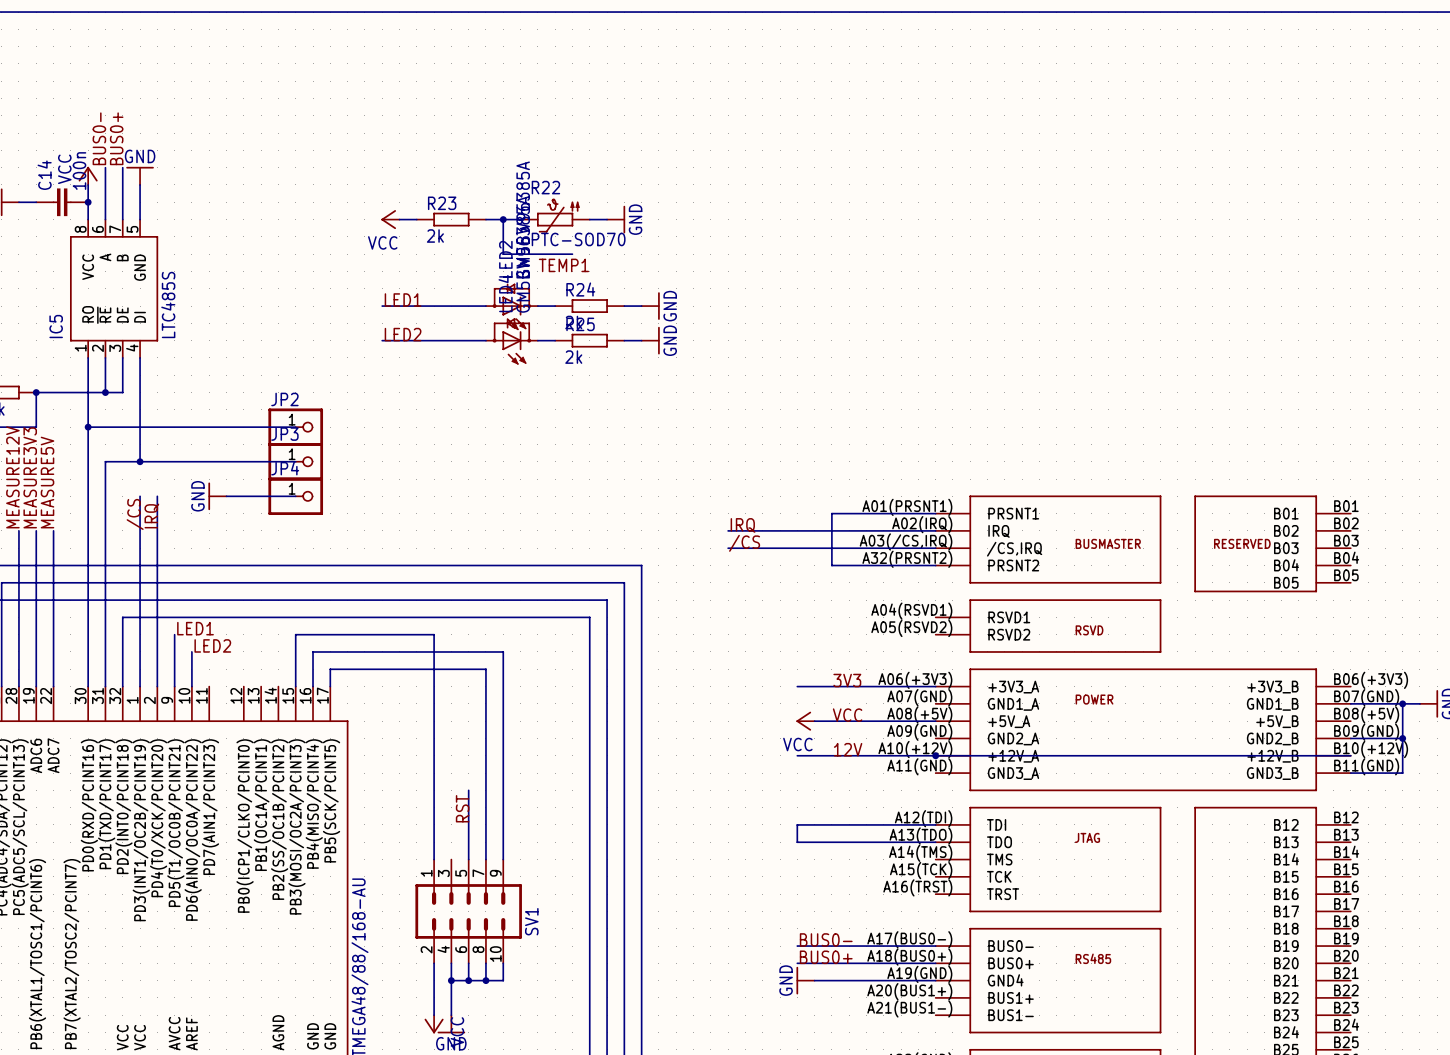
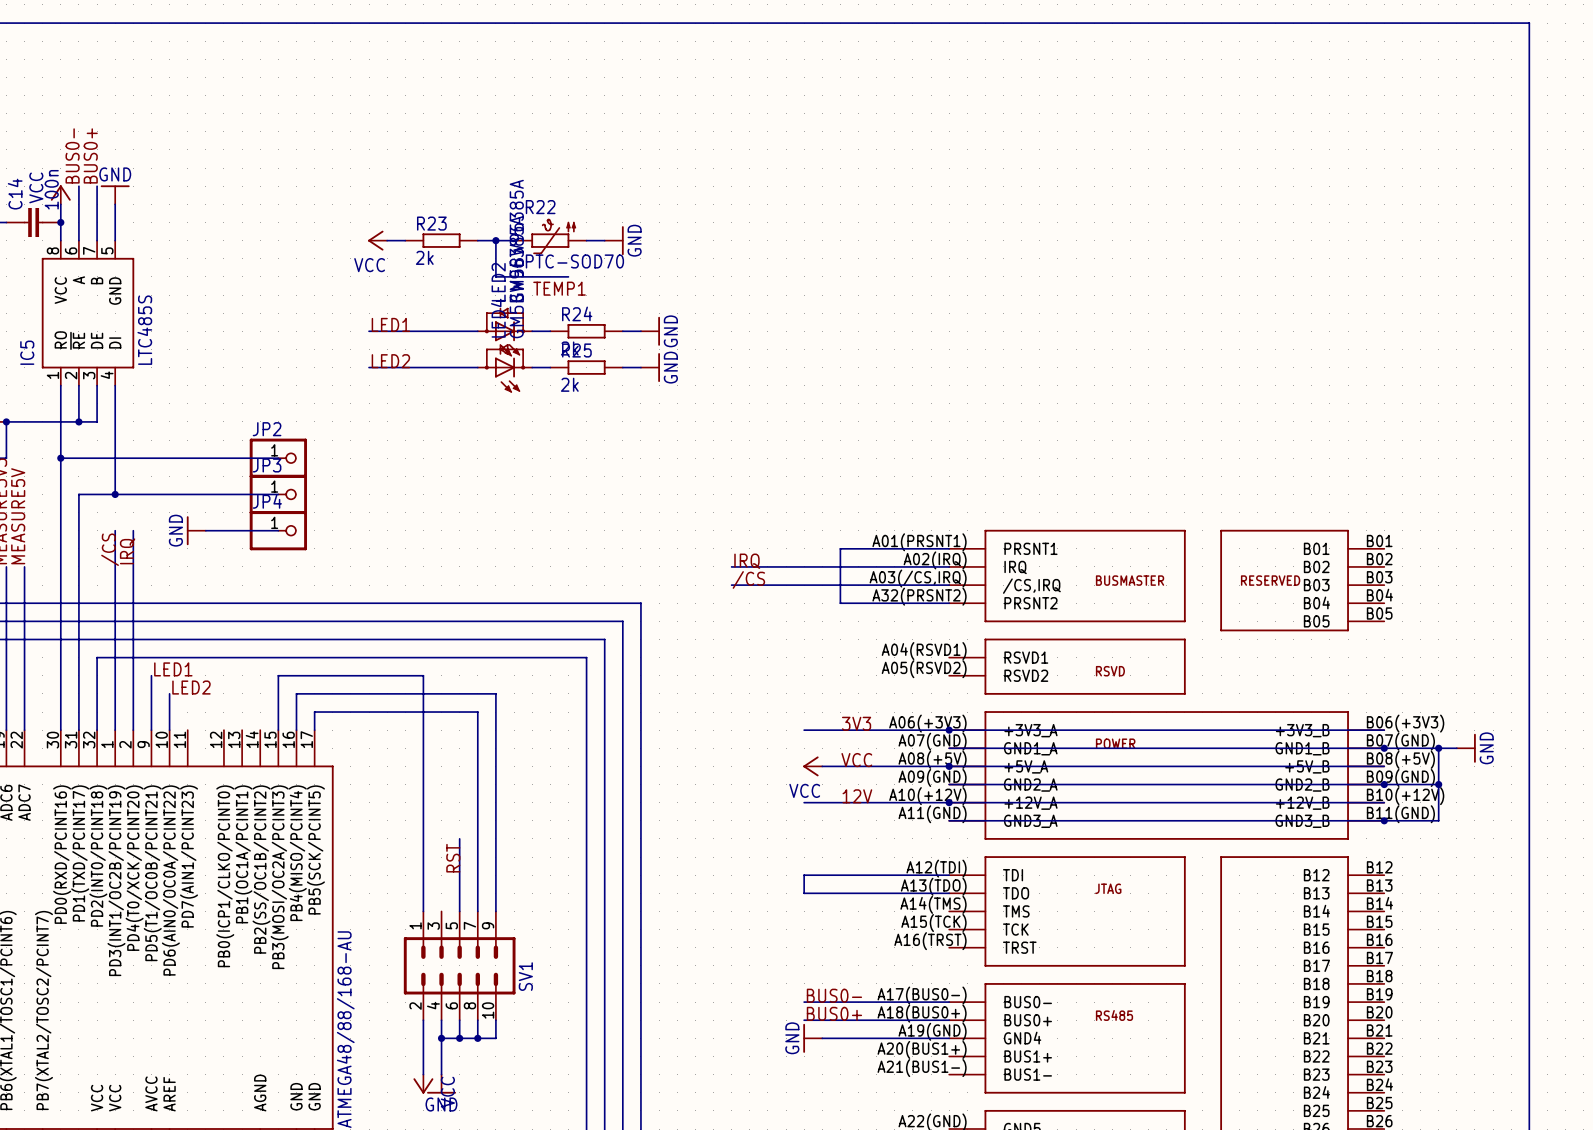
wire: none -> (949, 730) (1384, 730)
junction: none -> (949, 730)
wire: none -> (949, 748) (1384, 748)
junction: none -> (1384, 748)
wire: none -> (949, 766) (1384, 766)
junction: none -> (949, 766)
wire: none -> (949, 784) (1384, 784)
junction: none -> (1384, 784)
wire: none -> (949, 820) (1384, 820)
junction: none -> (1384, 820)

